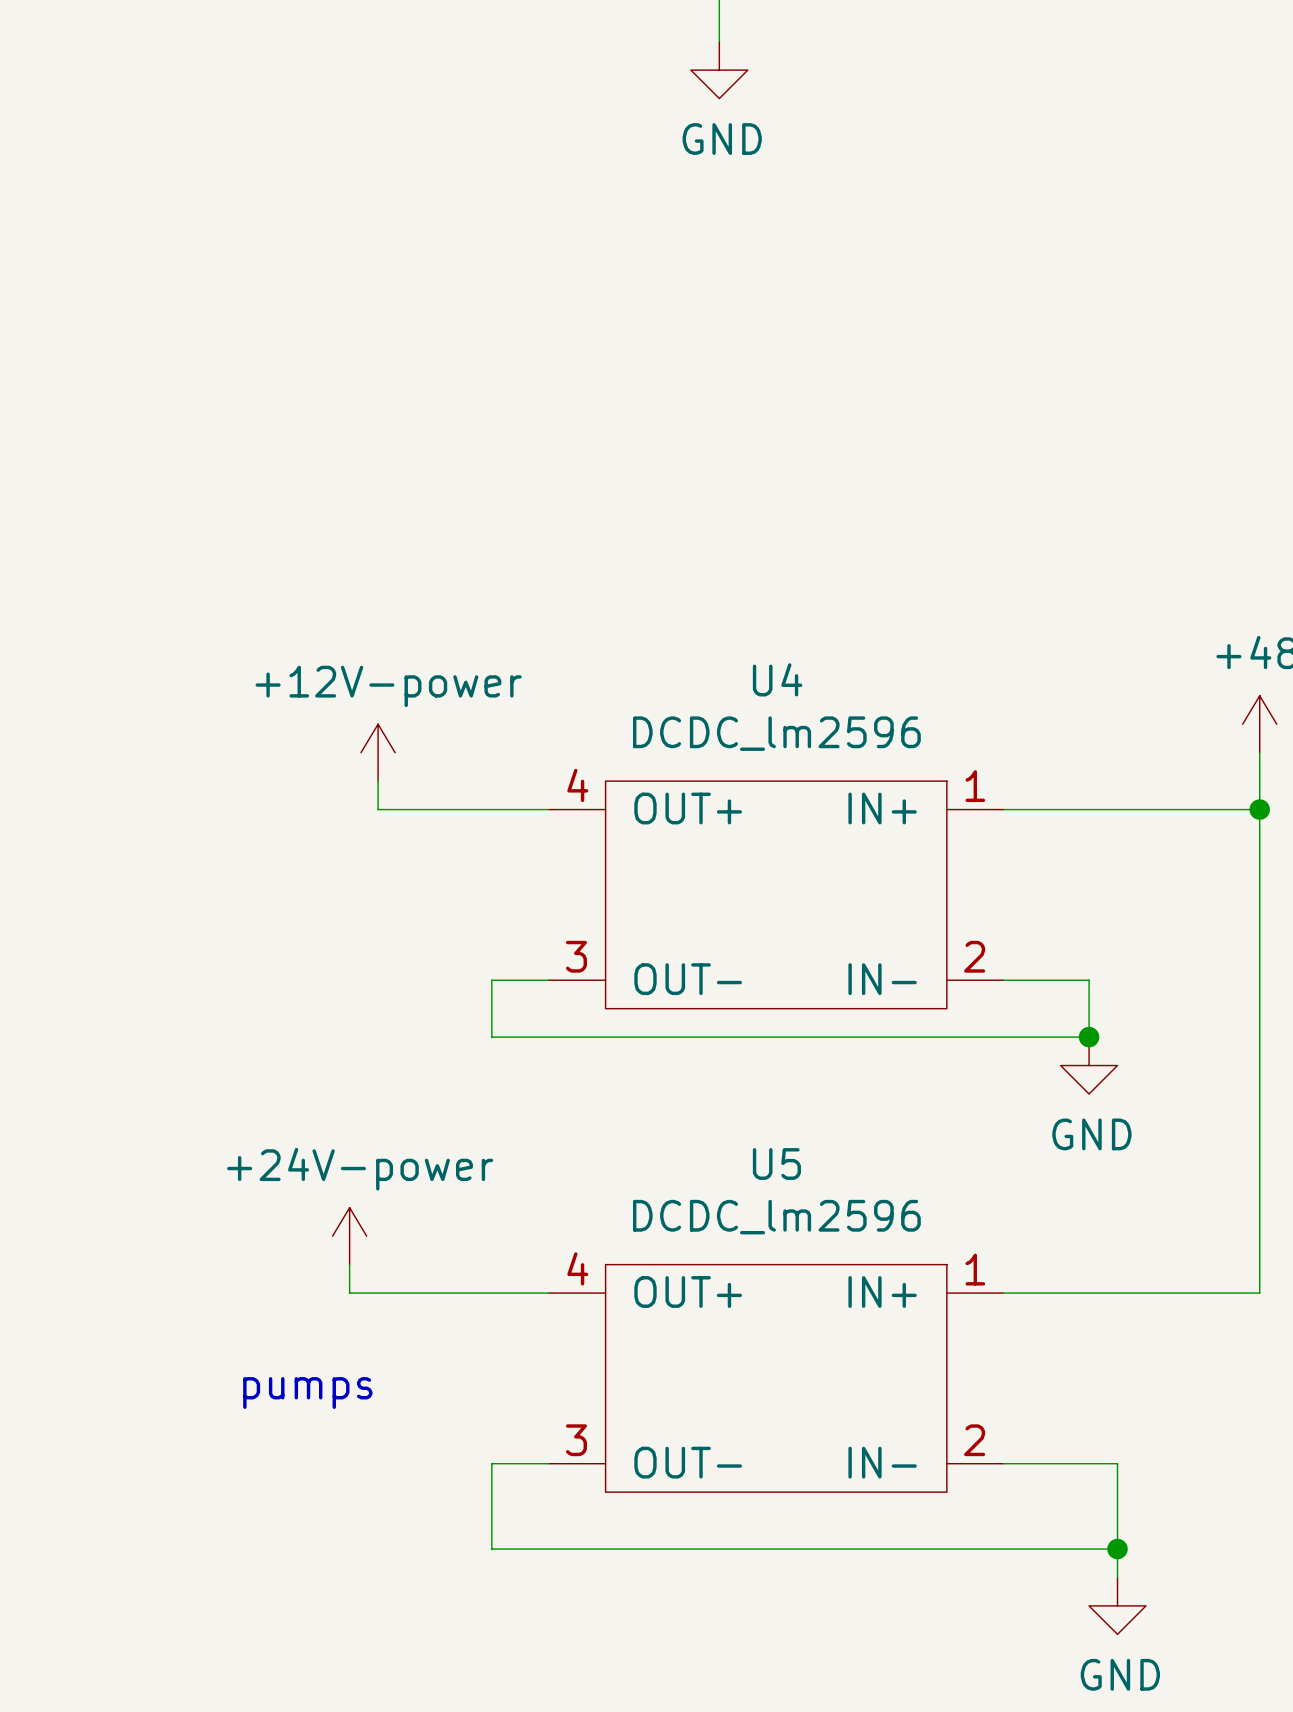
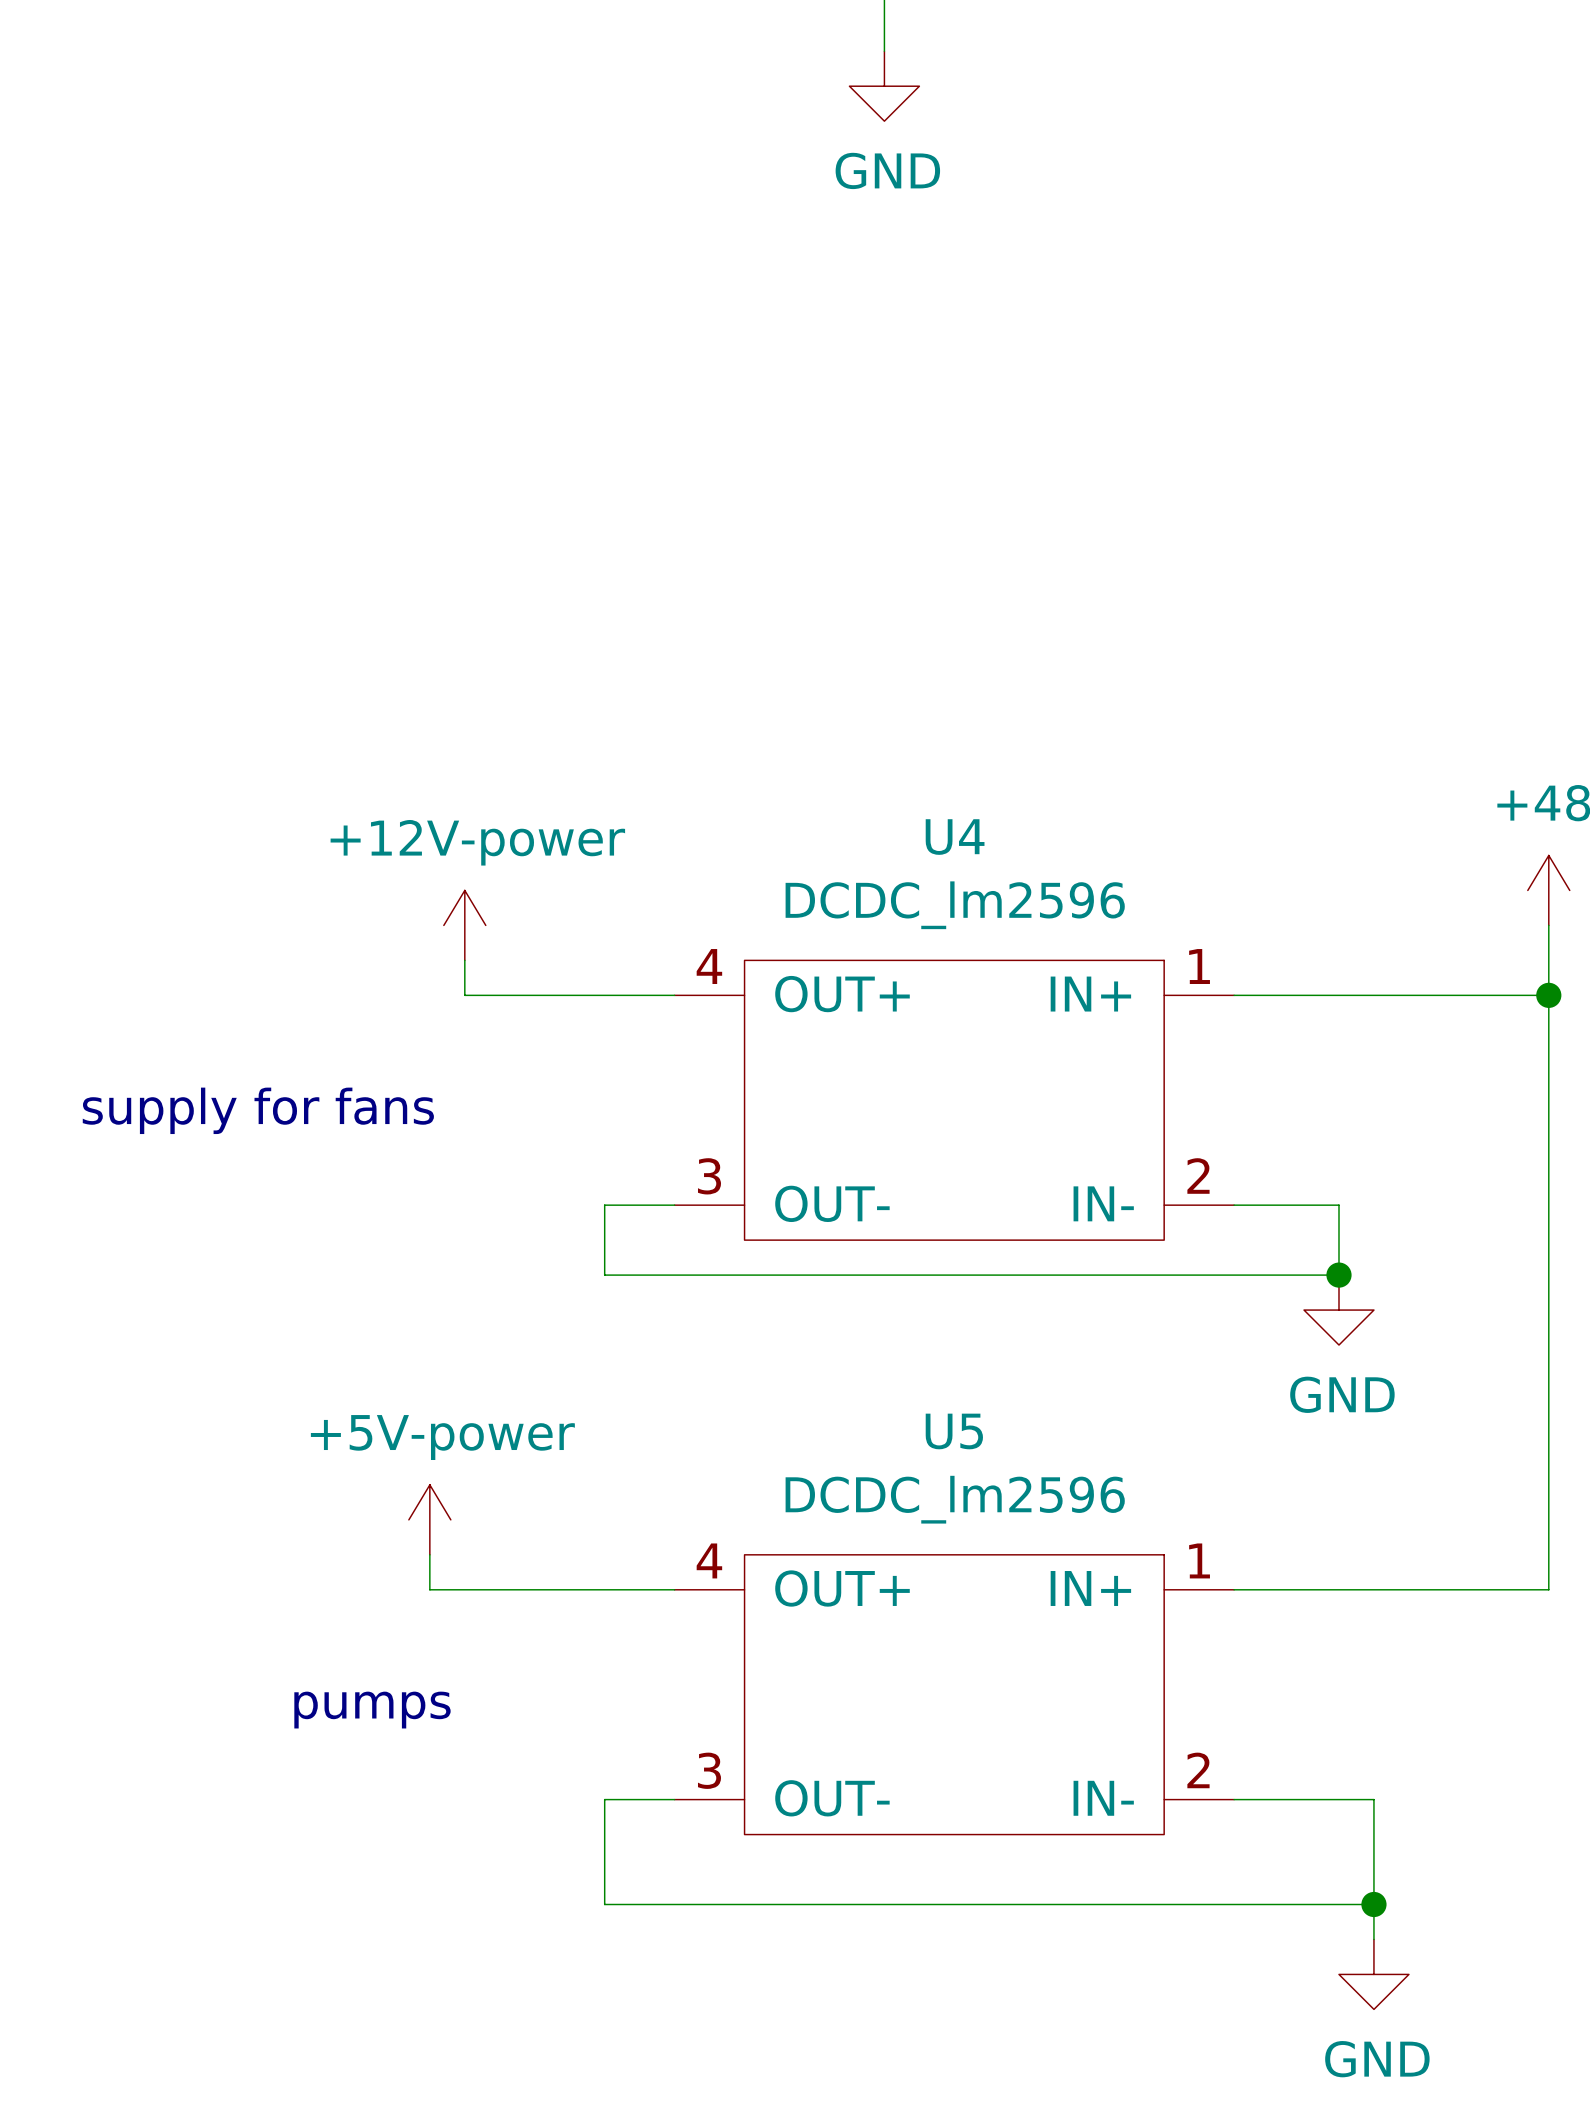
text: none -> supply for fans (258, 1110)
power symbol: +24V-power (349, 1236) -> +5V-power (429, 1519)

